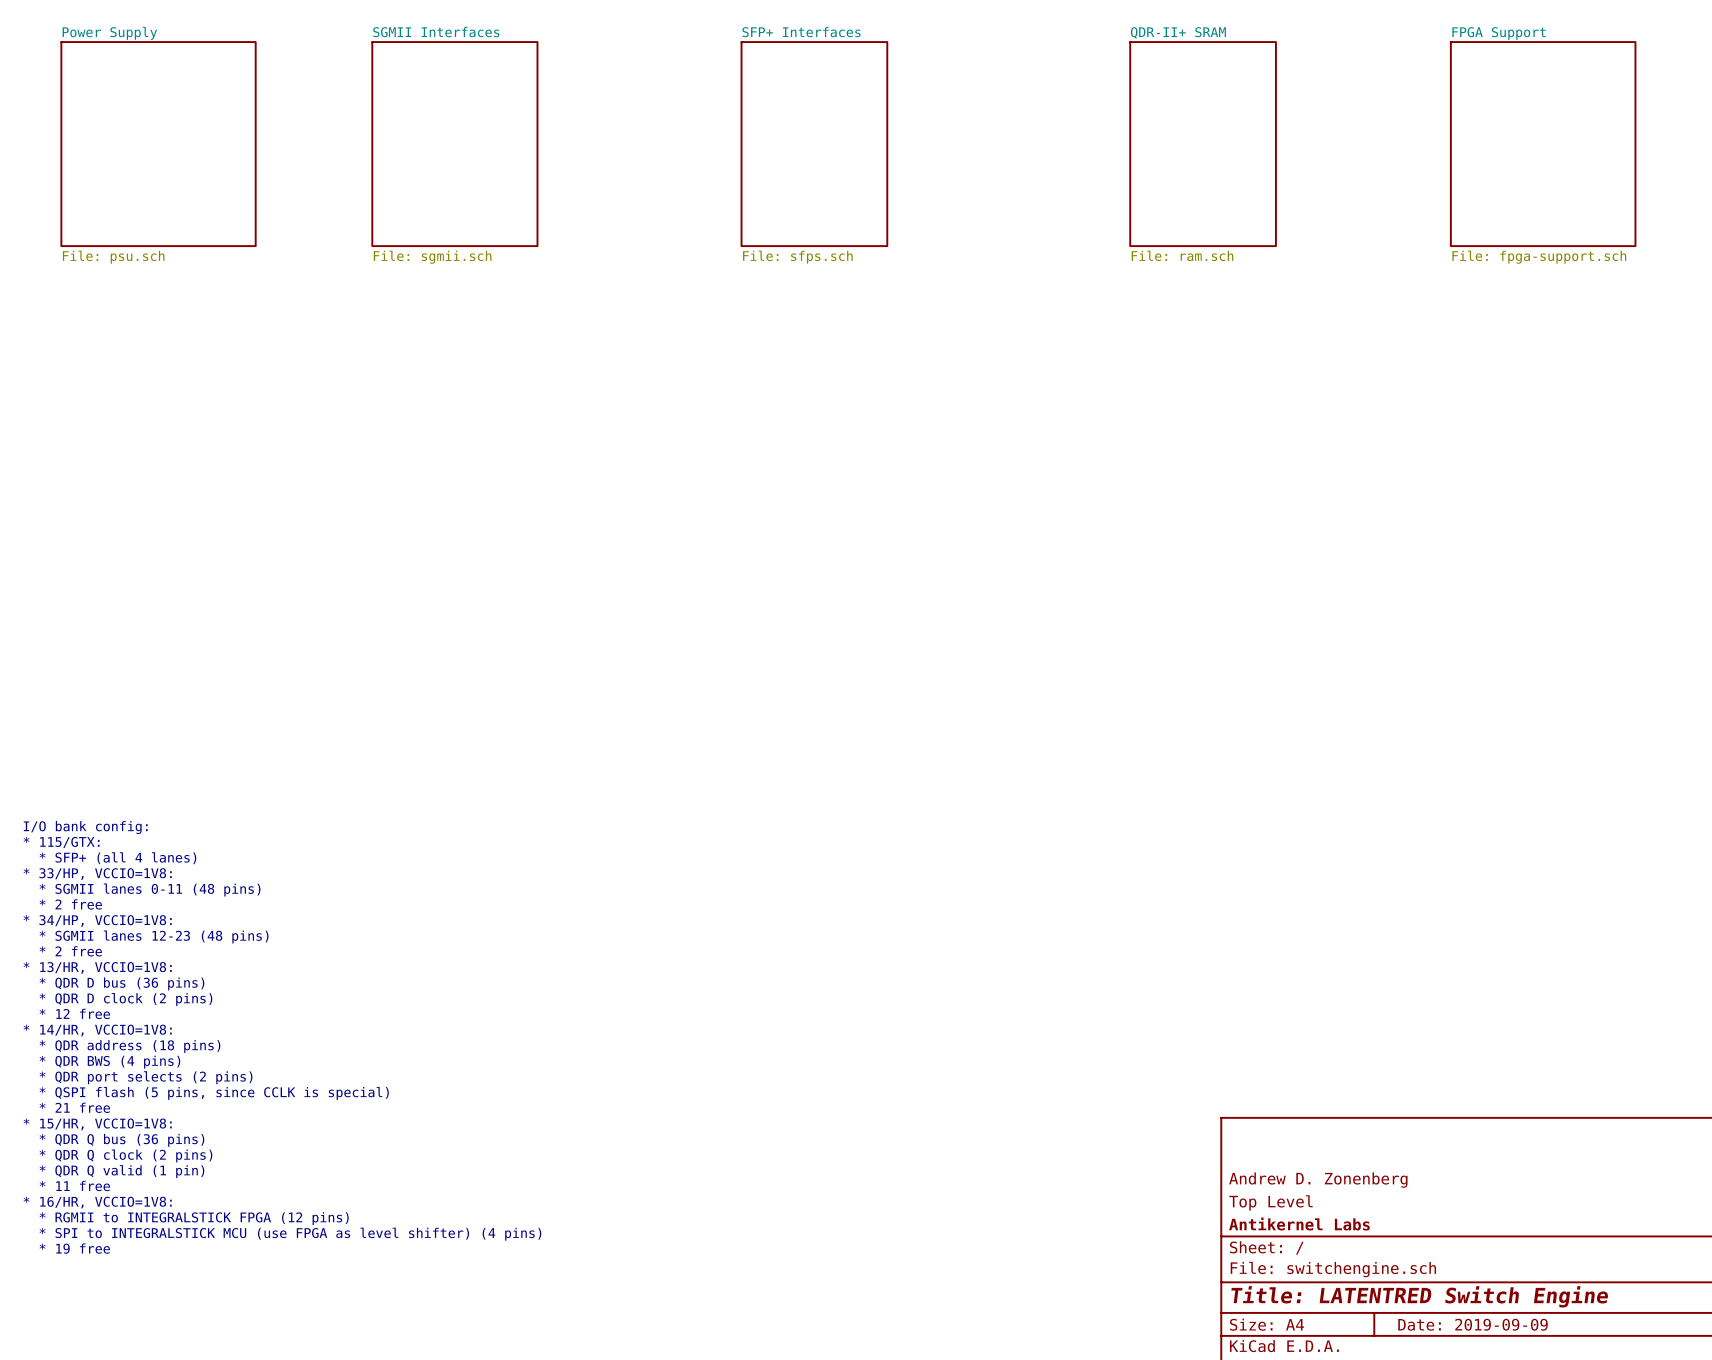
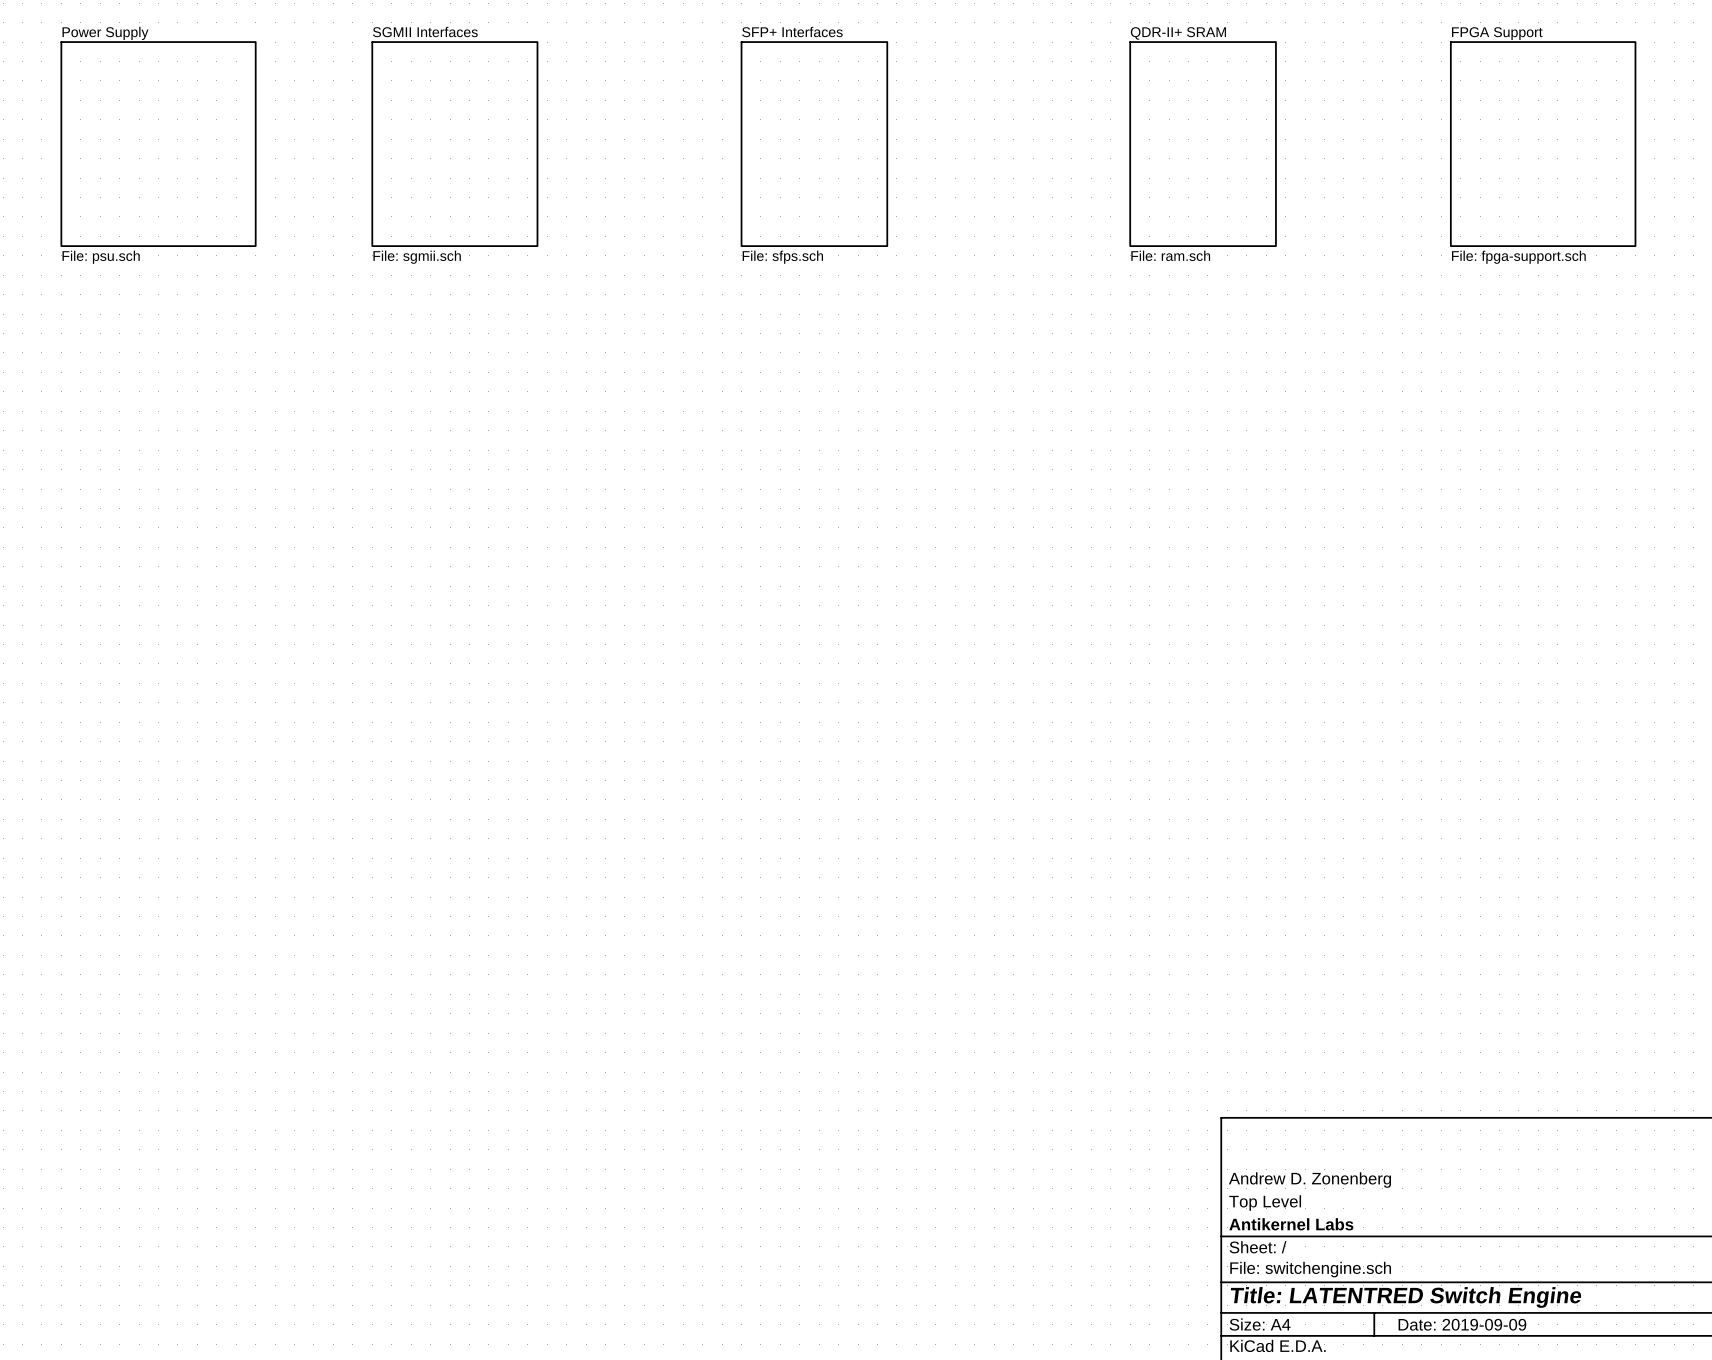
text: I/O bank config: (85, 827) -> none
text: * 115/GTX: (61, 842) -> none
text: * SFP+ (all 4 lanes) (117, 858) -> none
text: * 33/HP, VCCIO=1V8: (97, 874) -> none
text: * SGMII lanes 0-11 (48 pins) (150, 890) -> none
text: * 2 free (70, 904) -> none
text: * 34/HP, VCCIO=1V8: (97, 921) -> none
text: * SGMII lanes 12-23 (48 pins) (154, 936) -> none
text: * 2 free (70, 951) -> none
text: * 13/HR, VCCIO=1V8: (97, 967) -> none
text: * QDR D bus (36 pins) (121, 983) -> none
text: * QDR D clock (2 pins) (125, 999) -> none
text: * 12 free (74, 1013) -> none
text: * 14/HR, VCCIO=1V8: (97, 1030) -> none
text: * QDR address (18 pins) (129, 1046) -> none
text: * QDR BWS (4 pins) (109, 1062) -> none
text: * QDR port selects (2 pins) (146, 1077) -> none
text: * QSPI flash (5 pins, since CCLK is special) (214, 1093) -> none
text: * 21 free (74, 1107) -> none
text: * 15/HR, VCCIO=1V8: (97, 1124) -> none
text: * QDR Q bus (36 pins) (121, 1140) -> none
text: * QDR Q clock (2 pins) (125, 1155) -> none
text: * QDR Q valid (1 pin) (121, 1171) -> none
text: * 11 free (74, 1186) -> none
text: * 16/HR, VCCIO=1V8: (97, 1202) -> none
text: * RGMII to INTEGRALSTICK FPGA (12 pins) (194, 1218) -> none
text: * SPI to INTEGRALSTICK MCU (use FPGA as level shifter) (4 pins) (290, 1234) -> none
text: * 19 free (74, 1248) -> none

